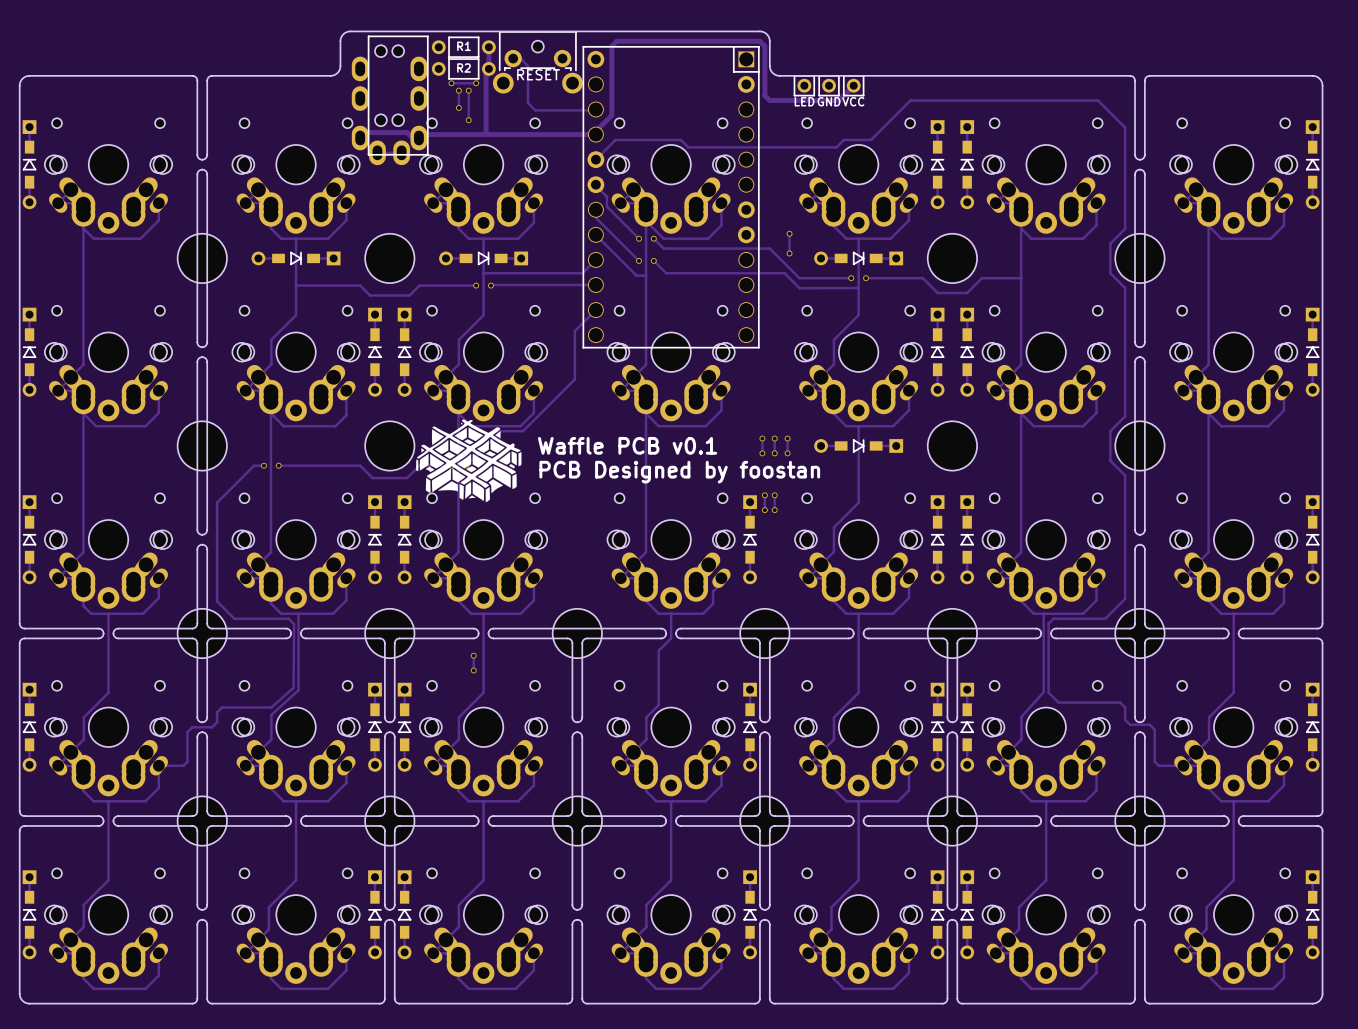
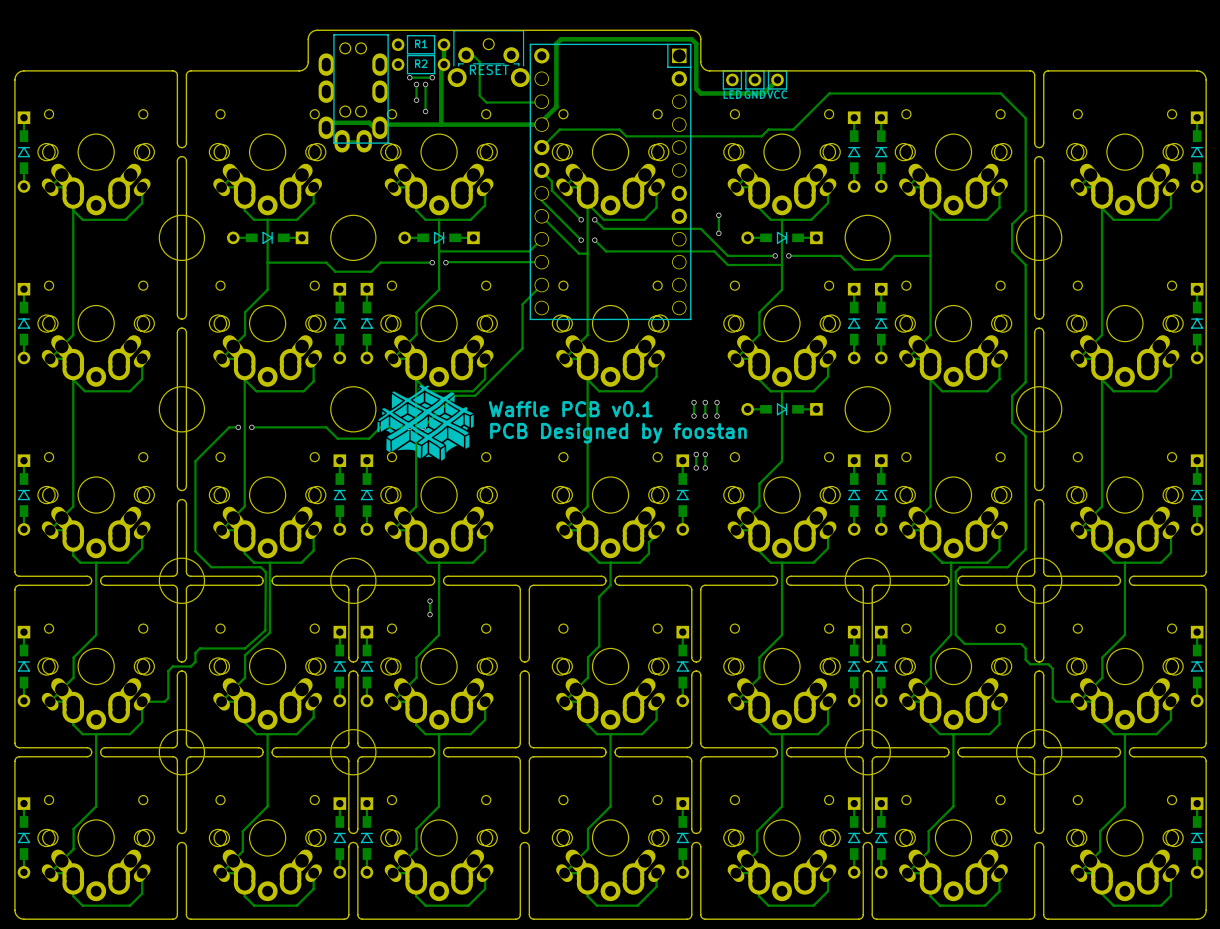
part: (577, 633) -> none
part: (764, 633) -> none
part: (577, 821) -> none
part: (764, 821) -> none

